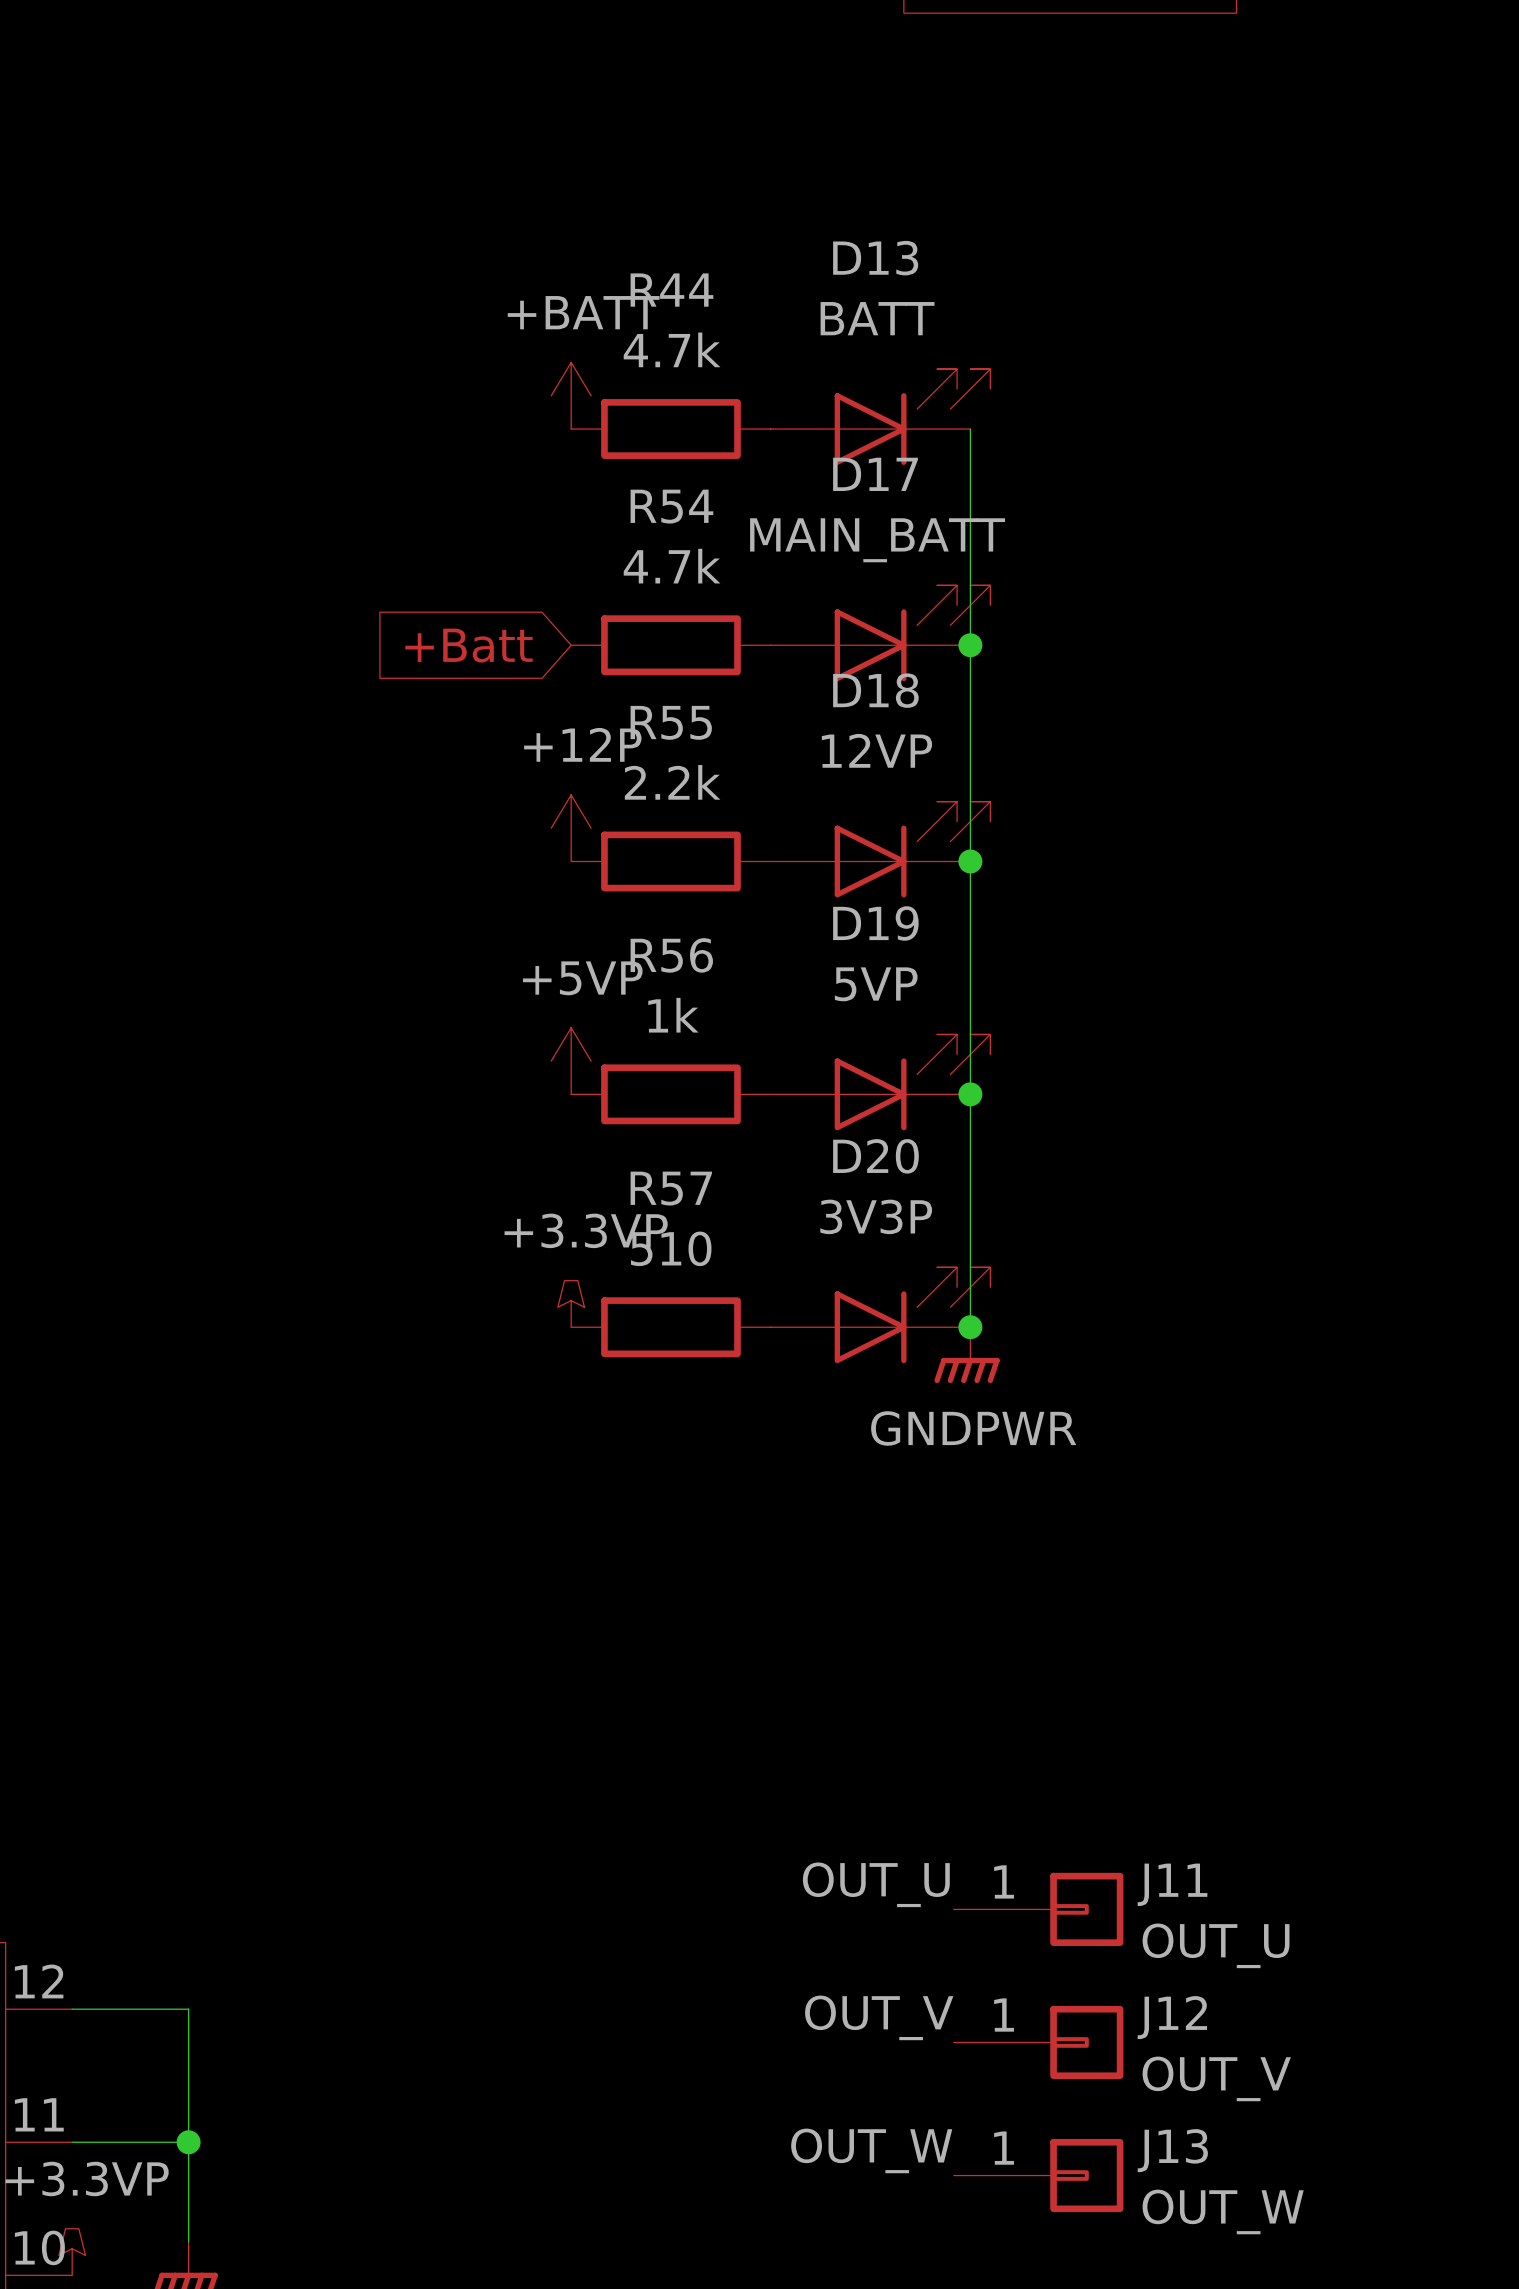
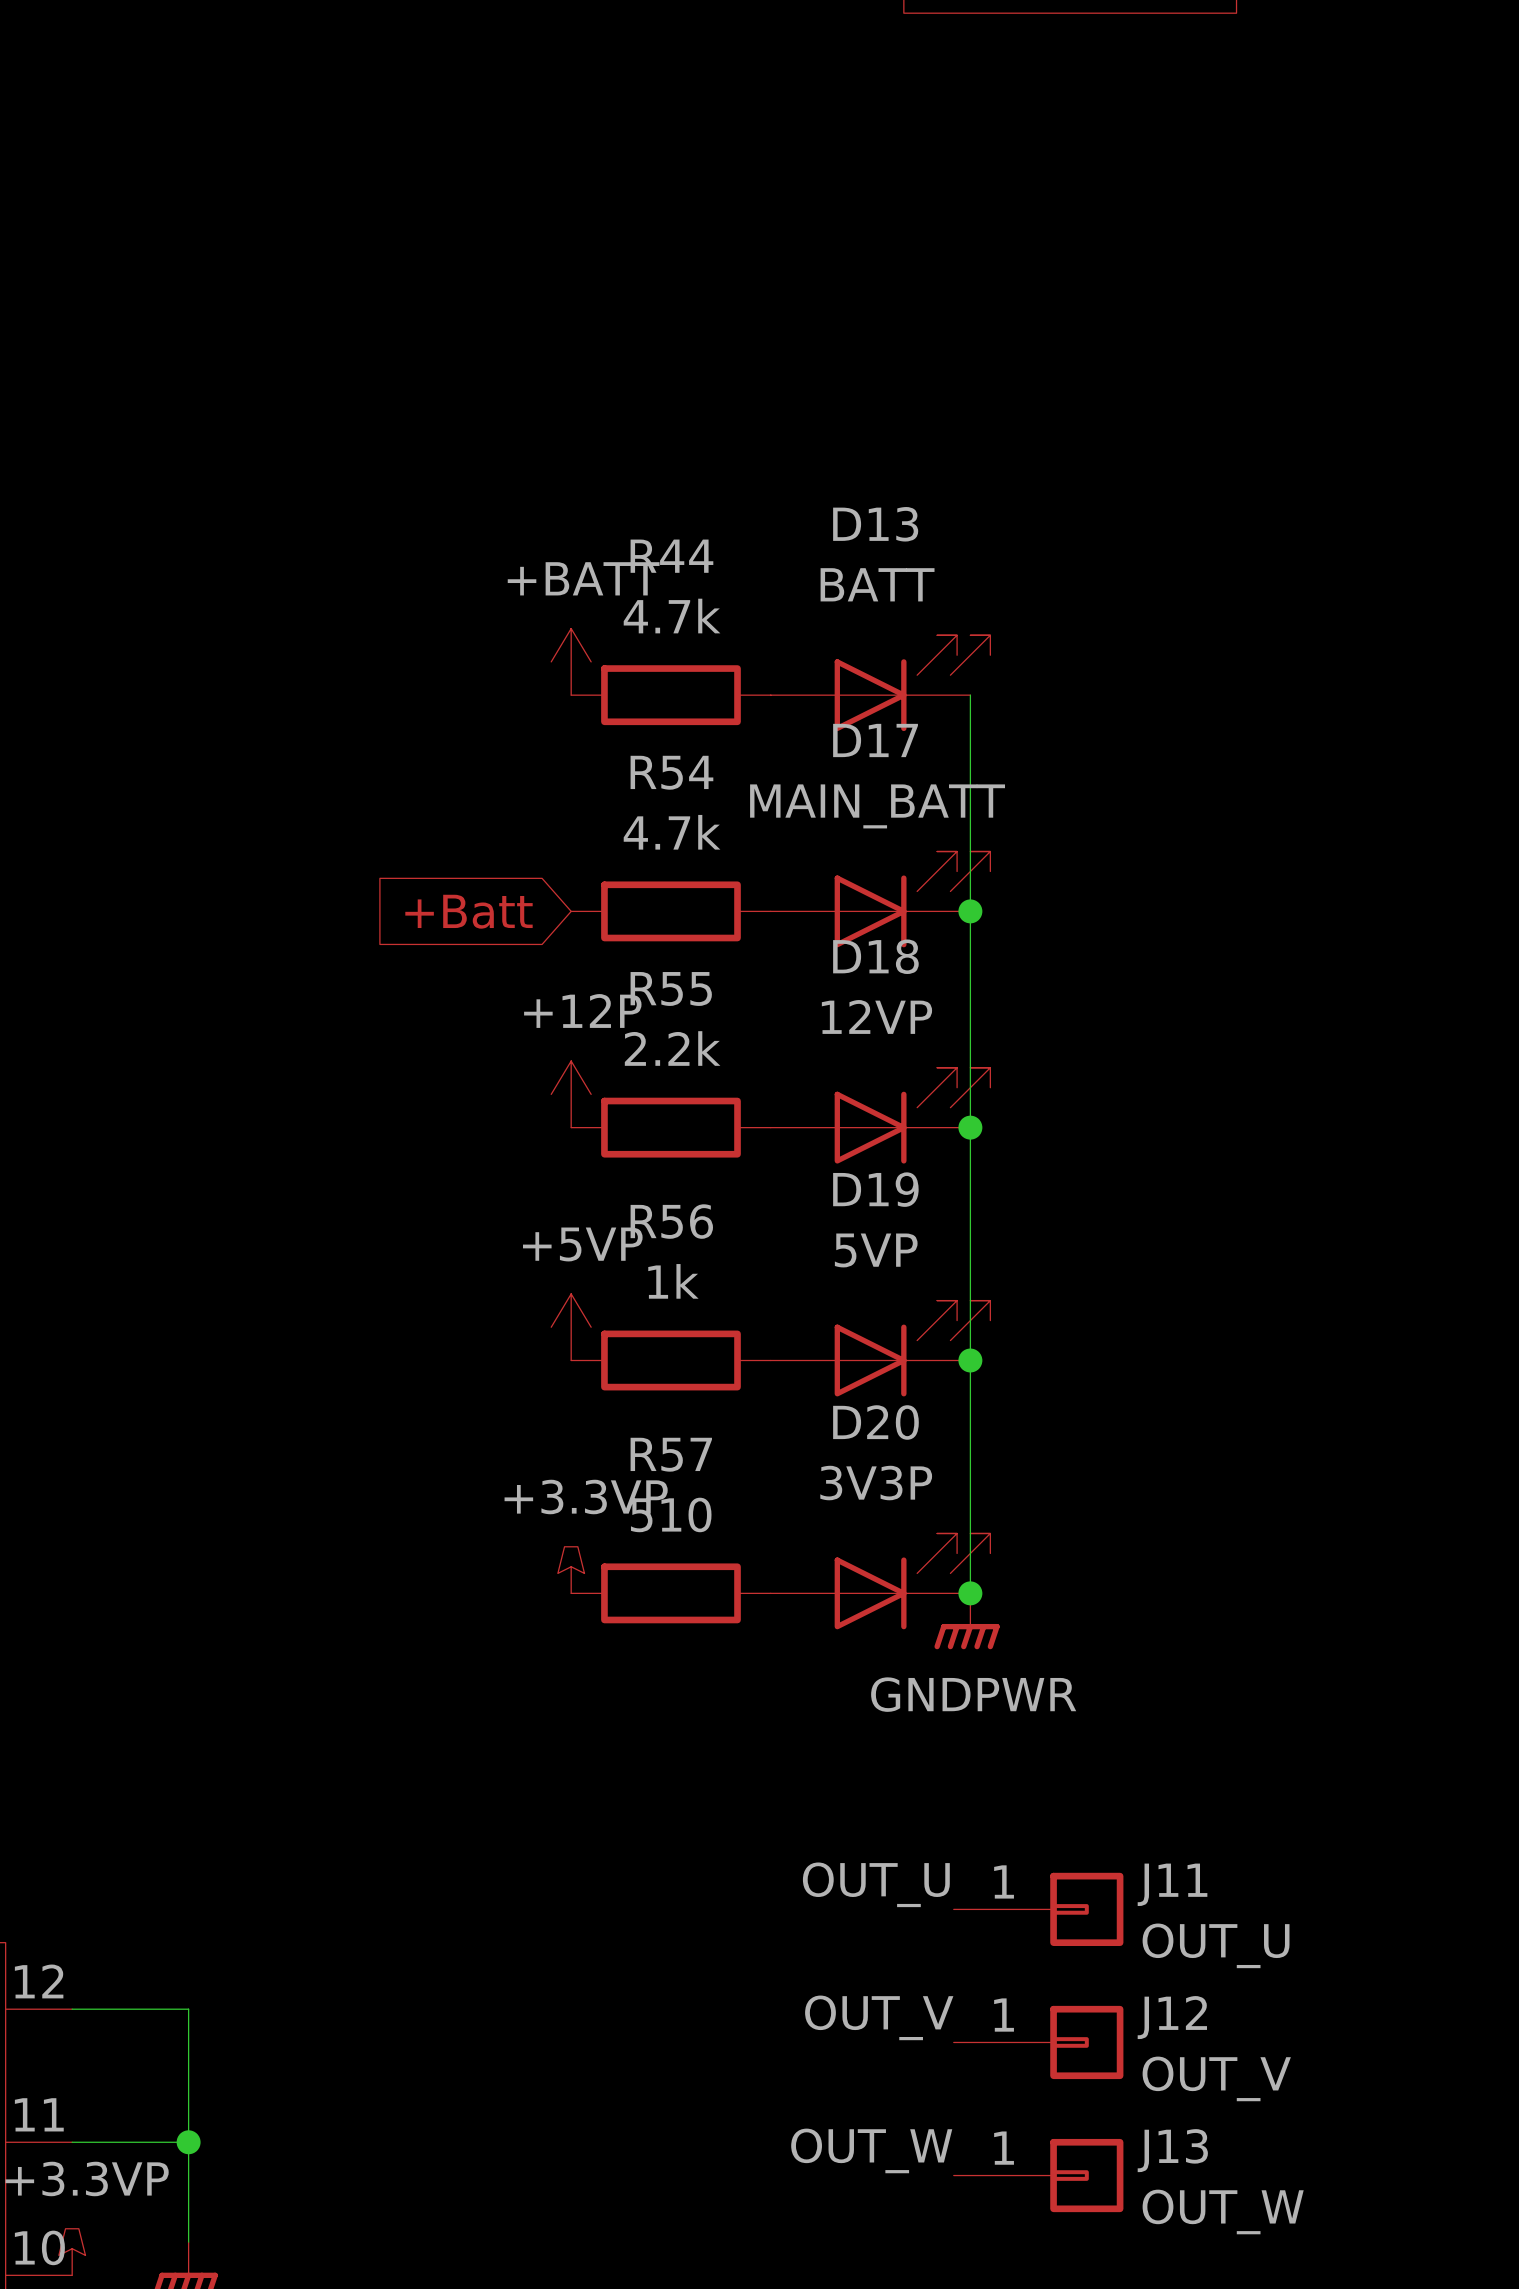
power symbol position: +BATT (571, 395) -> +BATT (571, 661)
D13 position: (880, 417) -> (880, 683)
R44 position: (670, 429) -> (670, 695)
wire: (970, 429) (970, 695) -> none
D17 position: (880, 633) -> (880, 899)
global label position: +Batt (468, 645) -> +Batt (468, 911)
R54 position: (670, 645) -> (670, 911)
junction: (970, 645) -> none
power symbol position: +12P (571, 828) -> +12P (571, 1094)
D18 position: (880, 849) -> (880, 1115)
R55 position: (670, 861) -> (670, 1127)
junction position: (970, 861) -> (970, 911)
power symbol: +5VP (571, 1061) -> none
D19 position: (880, 1082) -> (880, 1348)
R56 position: (670, 1094) -> (670, 1360)
junction position: (970, 1094) -> (970, 1127)
power symbol: +3.3VP (571, 1303) -> +5VP (571, 1327)
D20 position: (880, 1315) -> (880, 1581)
R57 position: (670, 1327) -> (670, 1593)
wire: none -> (970, 1327) (970, 1593)
junction position: (970, 1327) -> (970, 1360)
power symbol position: GNDPWR (967, 1355) -> GNDPWR (967, 1621)
power symbol: none -> +3.3VP (571, 1570)
junction: none -> (970, 1593)

